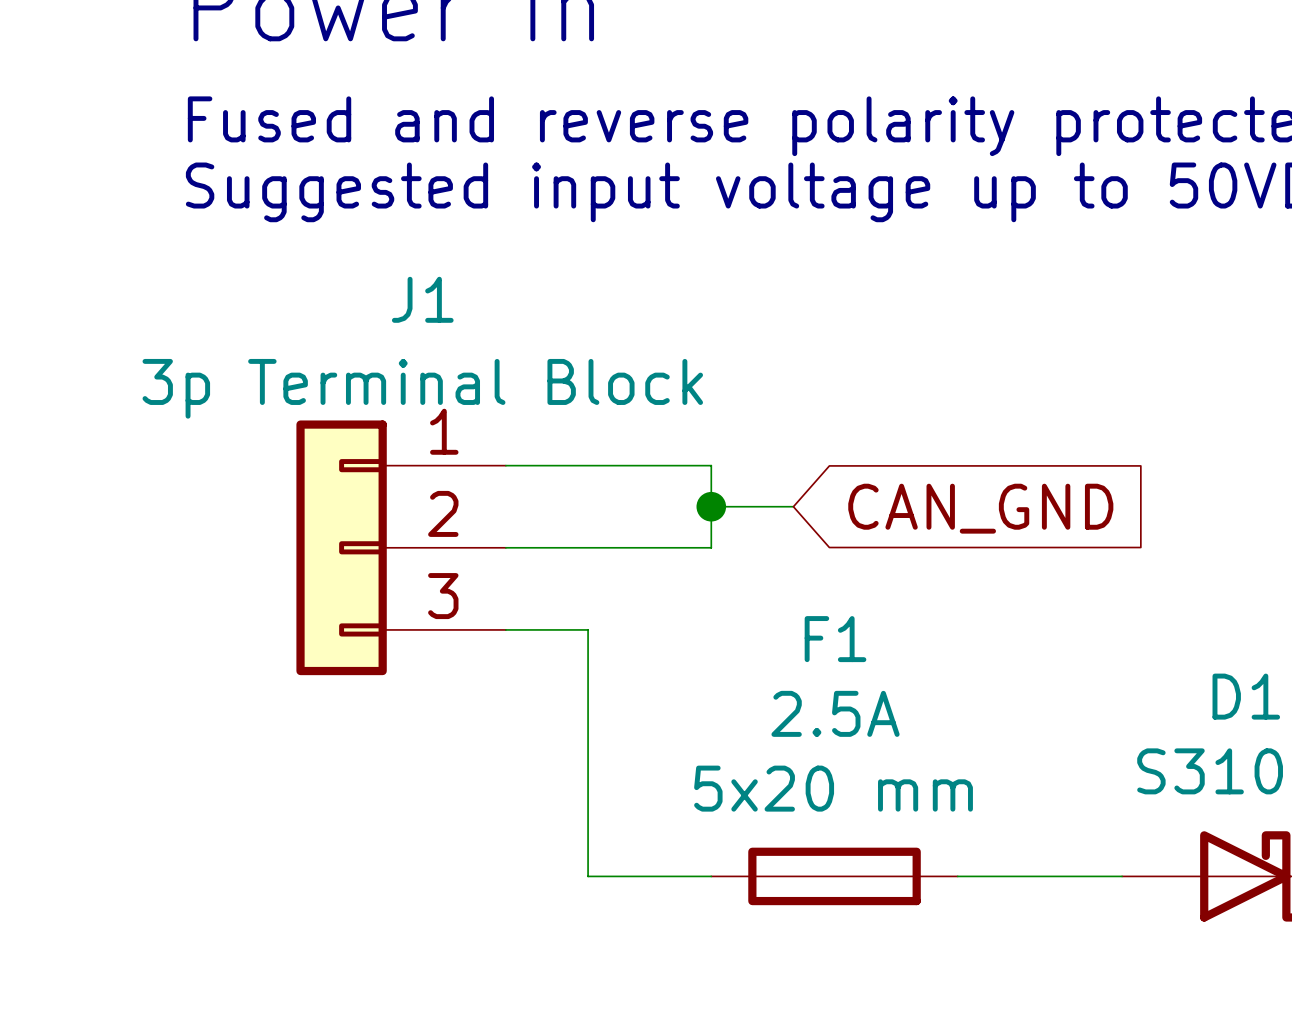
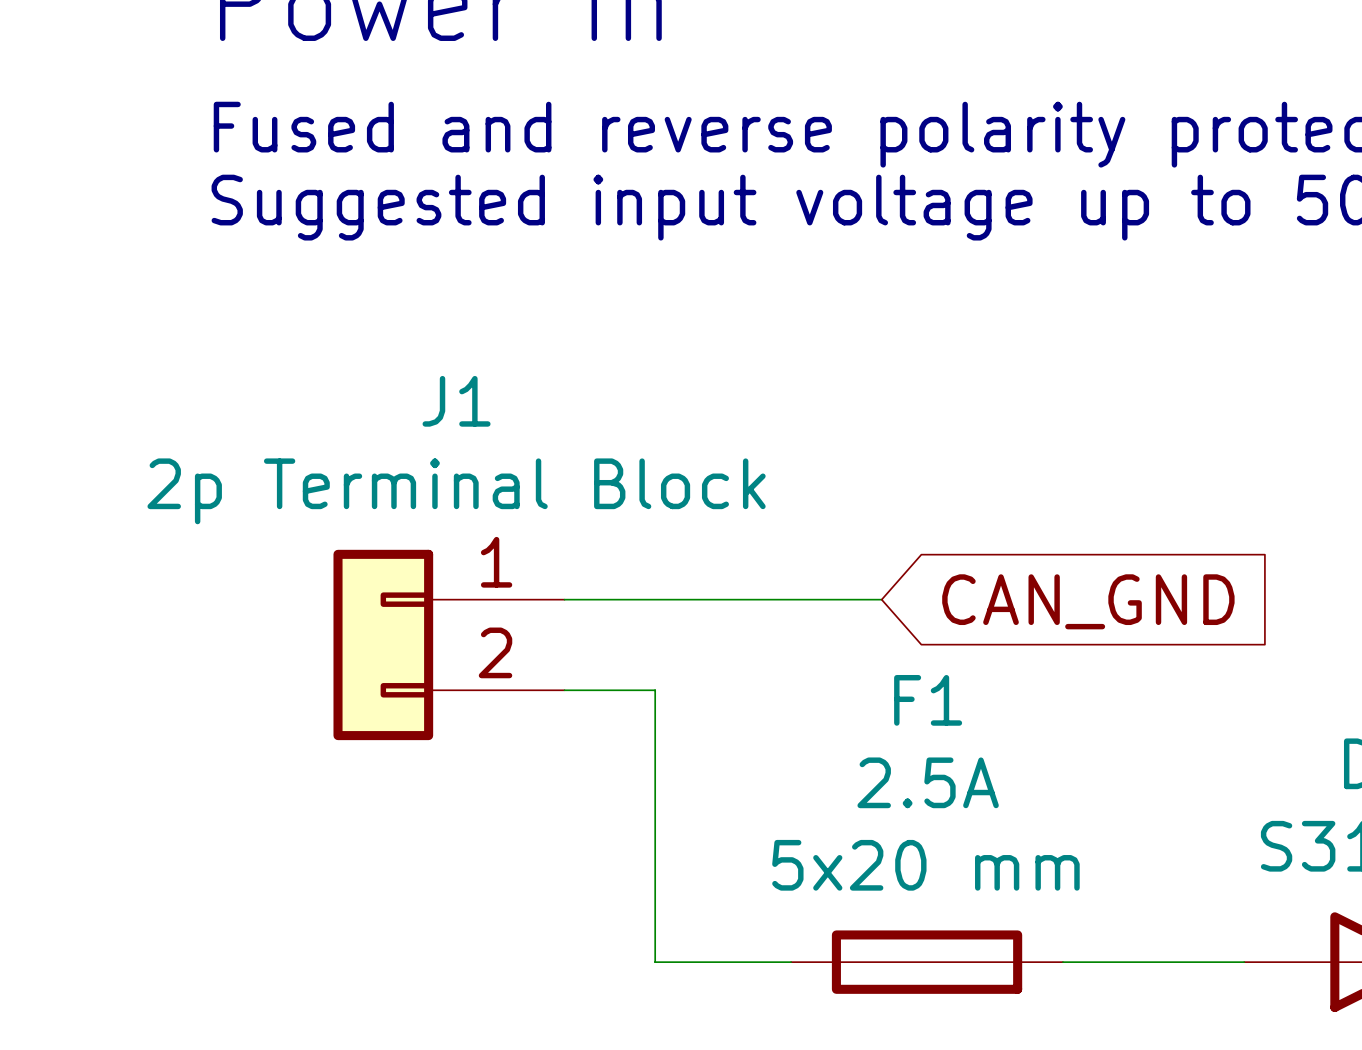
J1 value: 3p Terminal Block (422, 388) -> 2p Terminal Block (456, 491)
J1 symbol: [296, 420, 506, 676] -> [333, 549, 565, 741]
wire: (505, 465) (711, 465) (711, 547) -> (881, 599) (791, 599)
wire: (711, 506) (793, 506) -> none
junction: (711, 506) -> none
global label position: CAN_GND (980, 508) -> CAN_GND (1088, 601)

